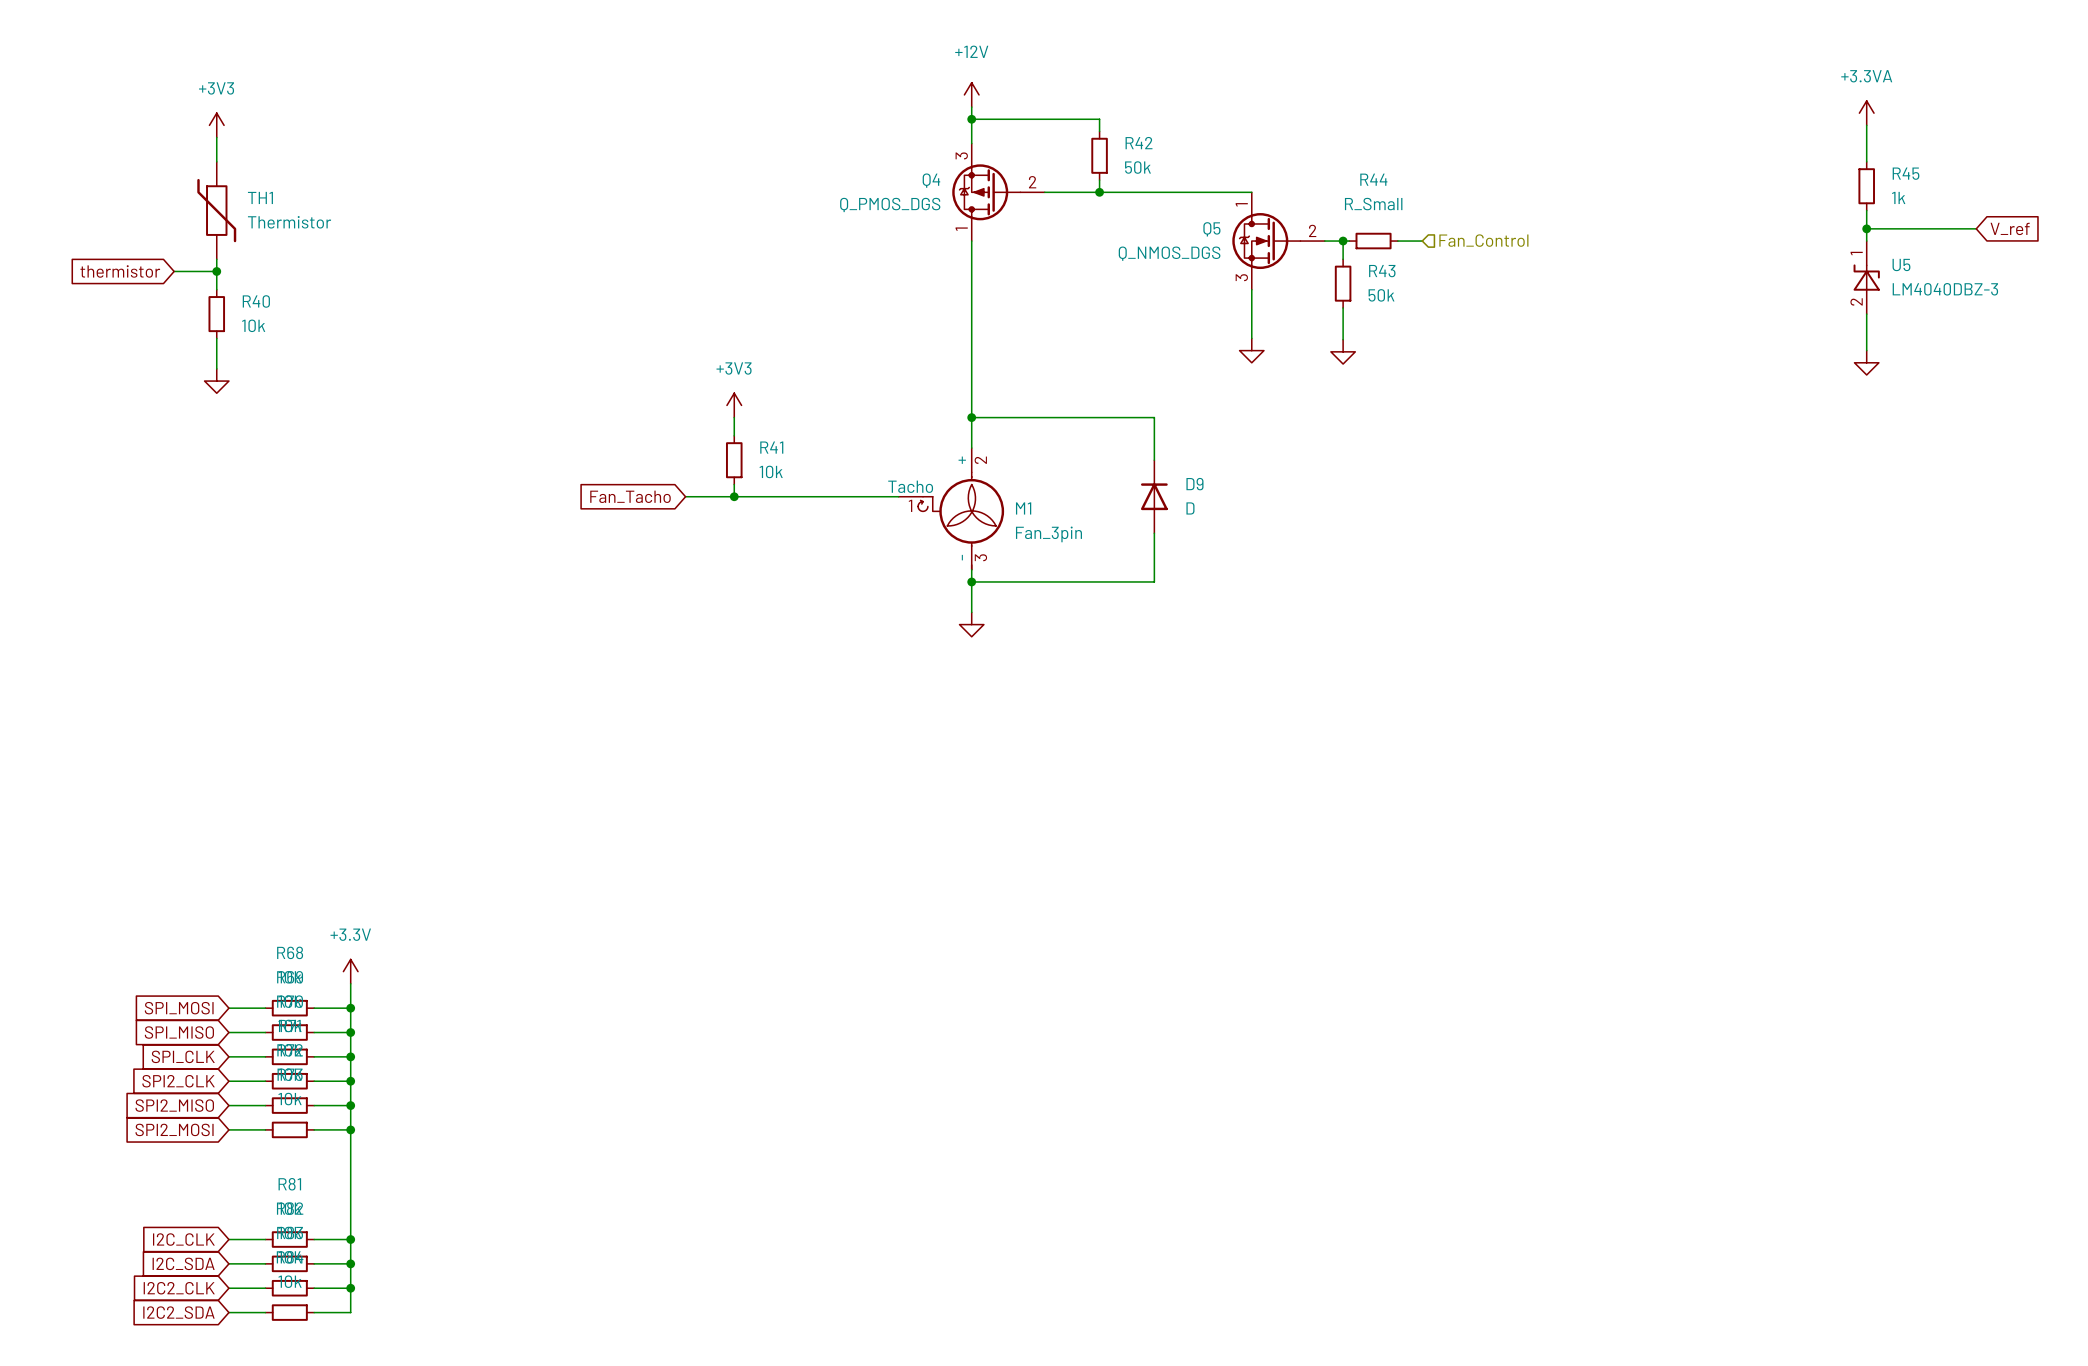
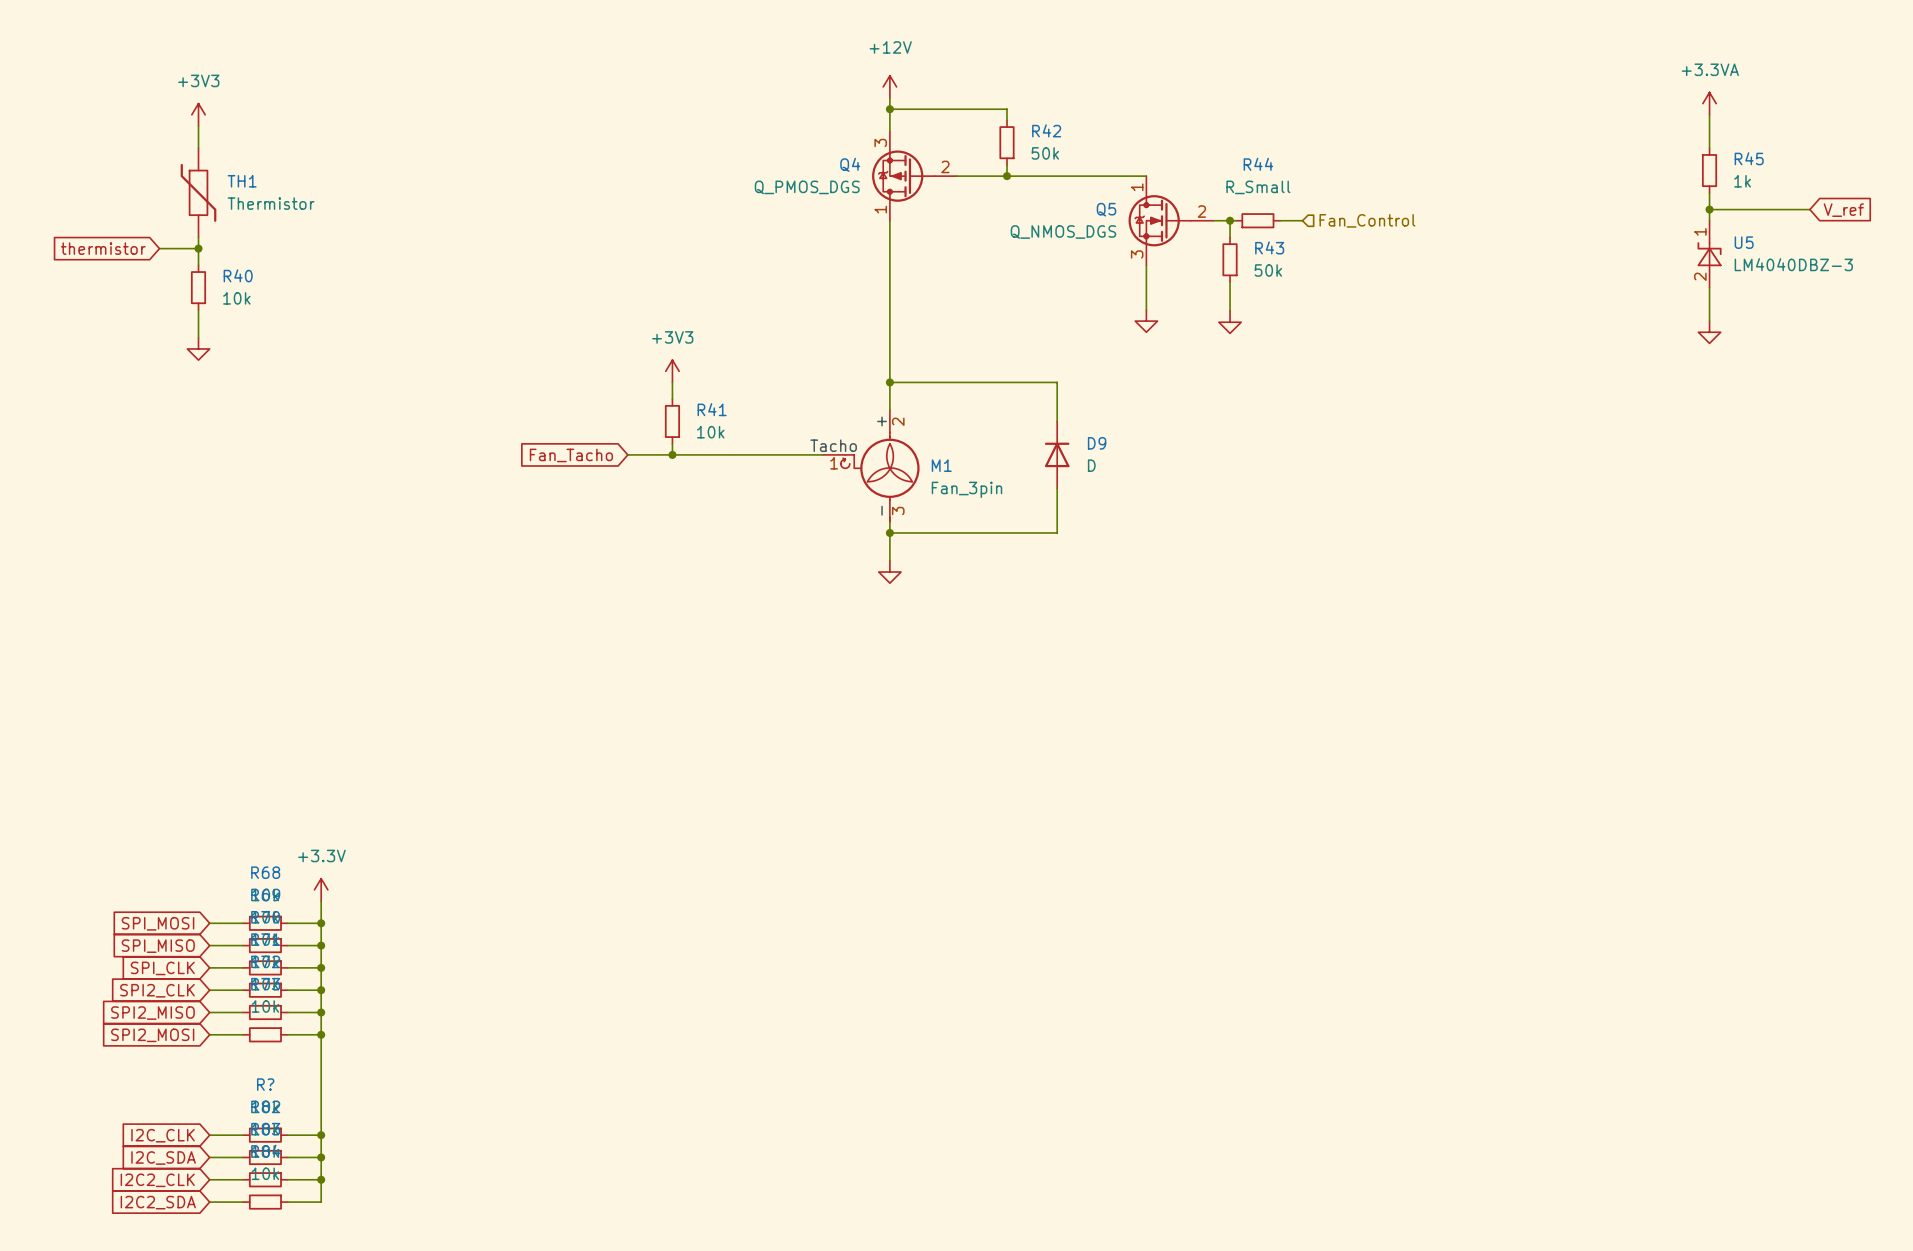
R81 name: R81 (289, 1184) -> R? (265, 1084)

